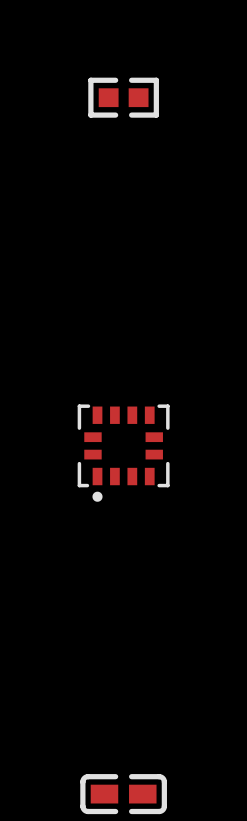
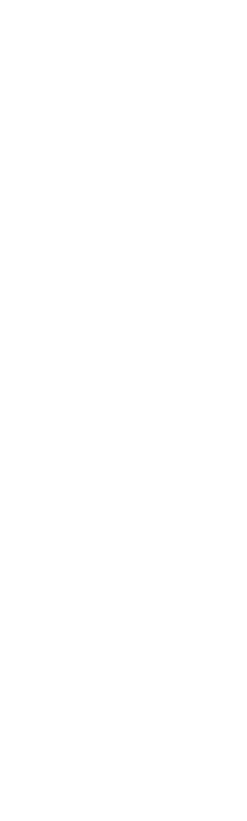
part: (123, 97) -> none
part: (123, 453) -> none
part: (123, 794) -> none

